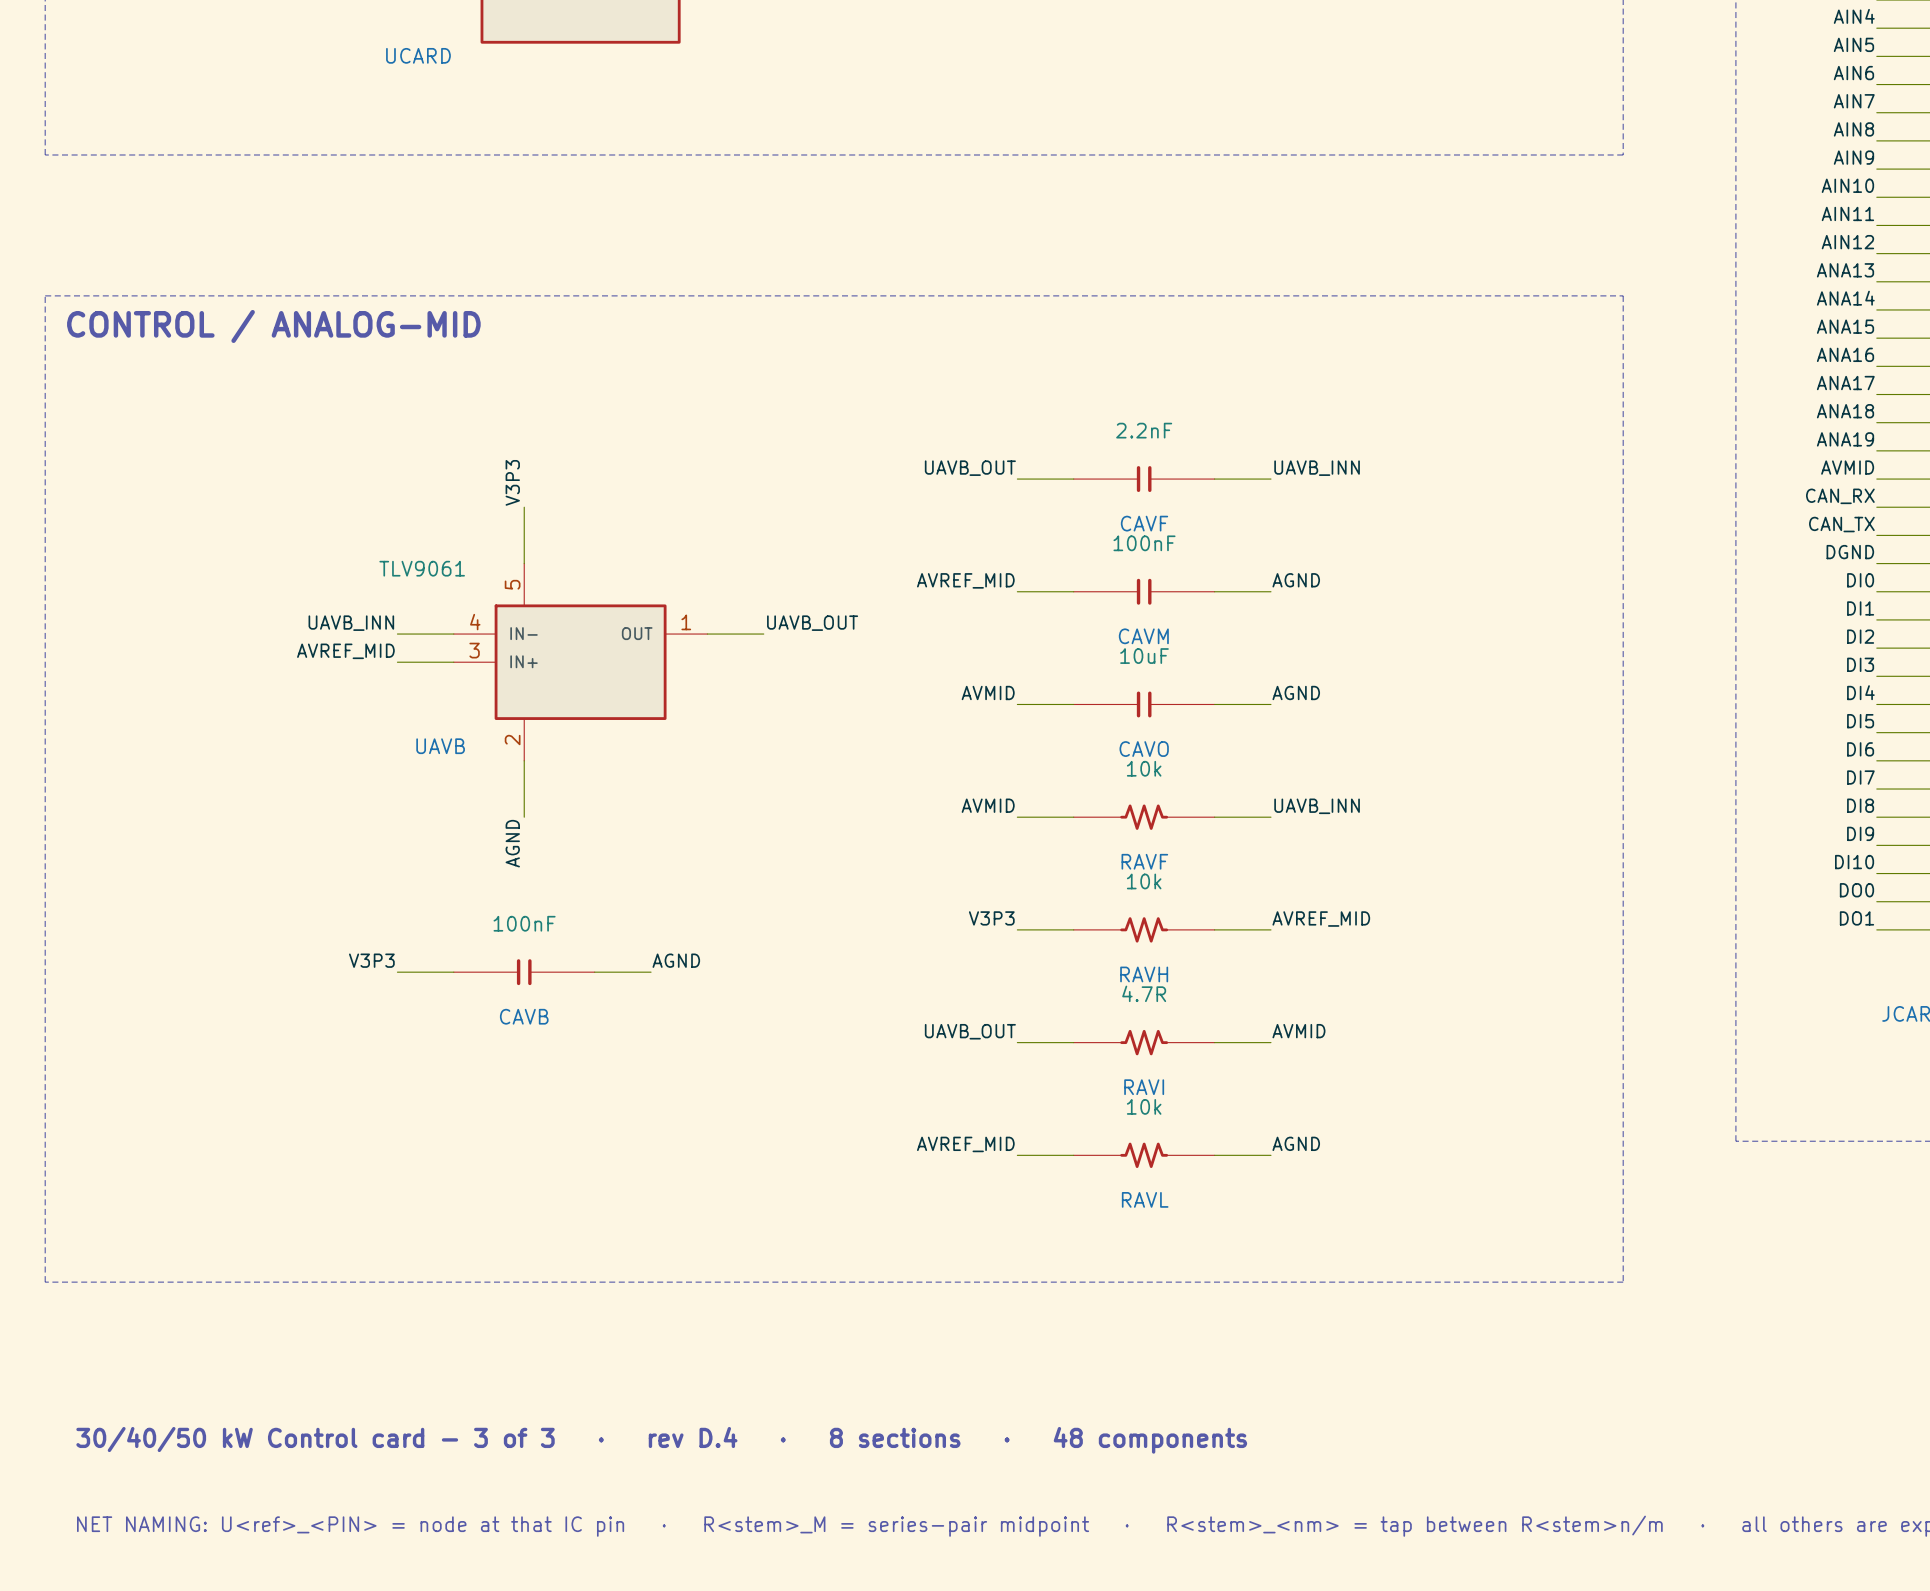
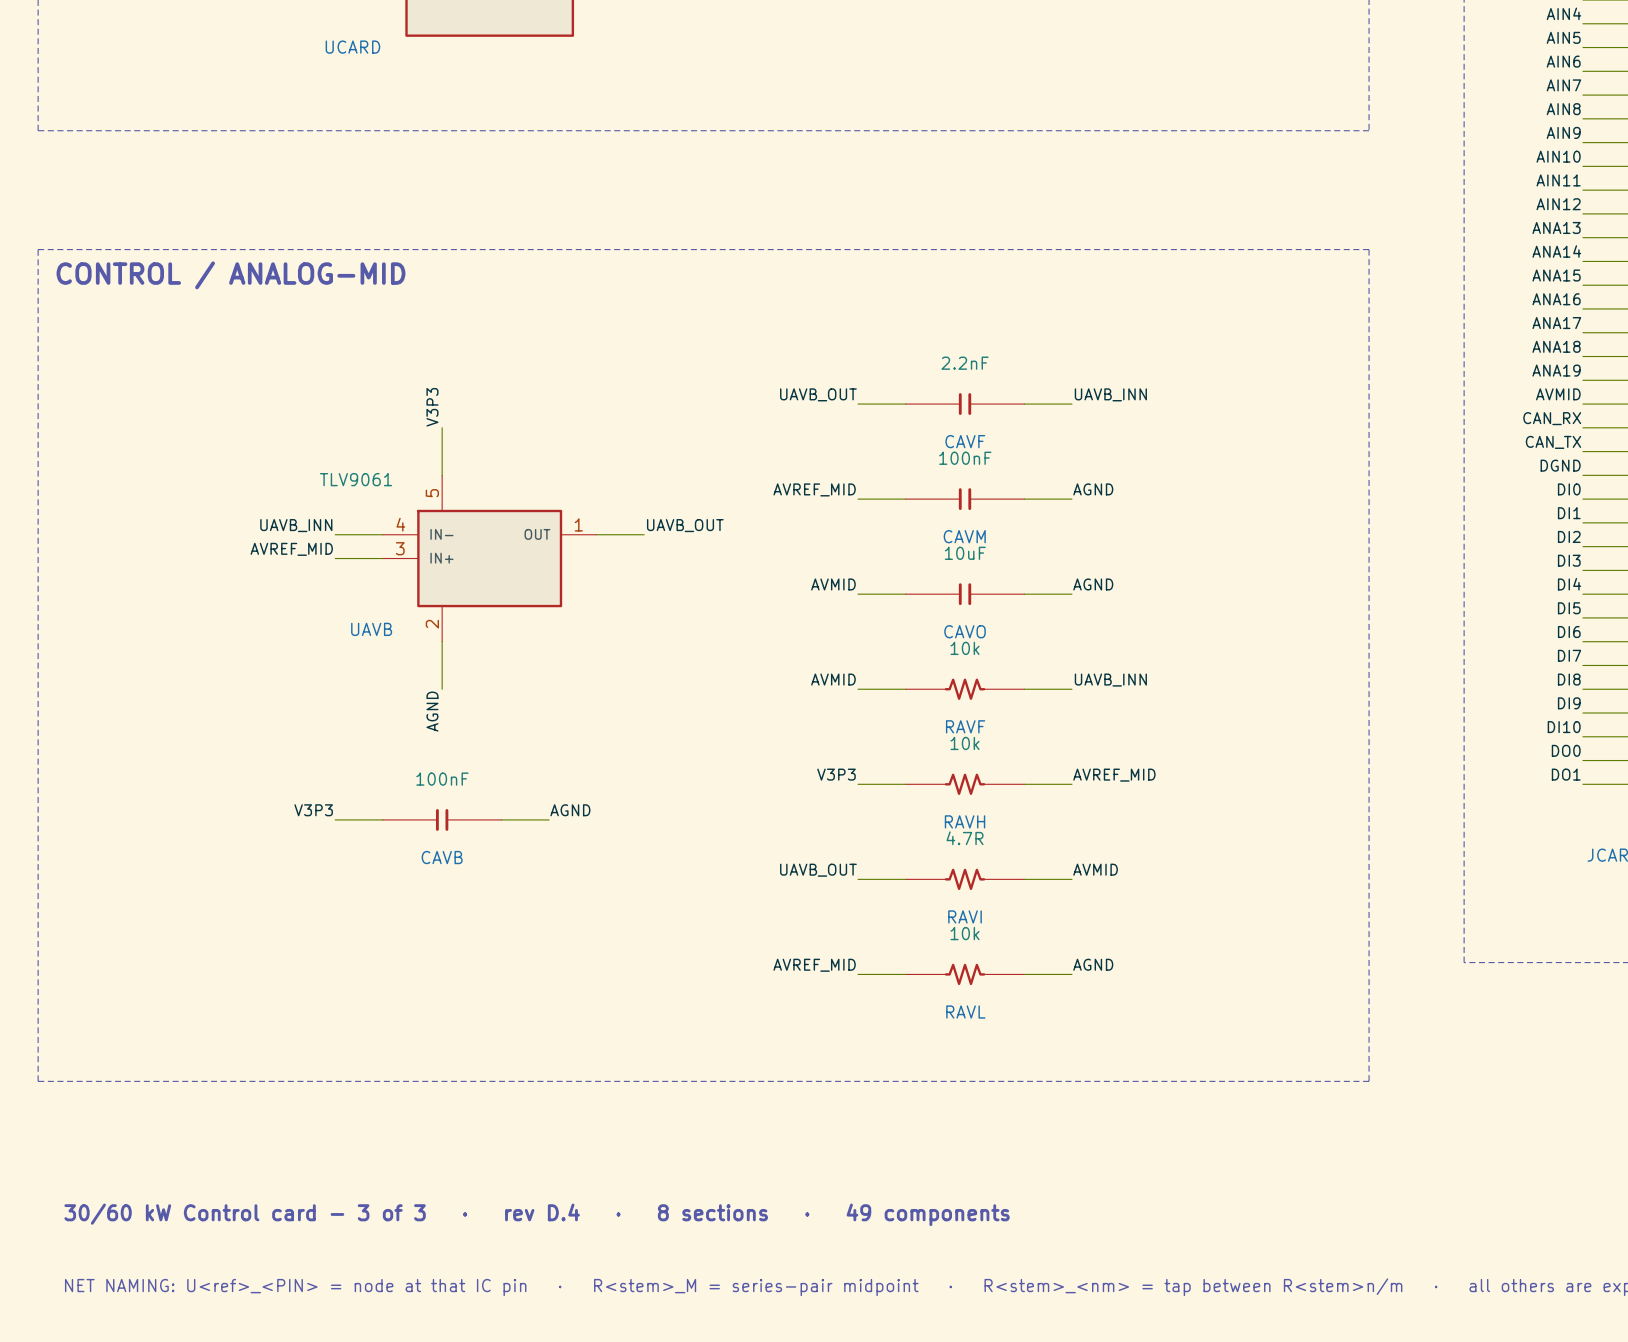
text: 30/40/50 kW Control card - 3 of 3 · rev D.4 · 8 sections · 48 components (661, 1440) -> 30/60 kW Control card - 3 of 3 · rev D.4 · 8 sections · 49 components (537, 1214)

